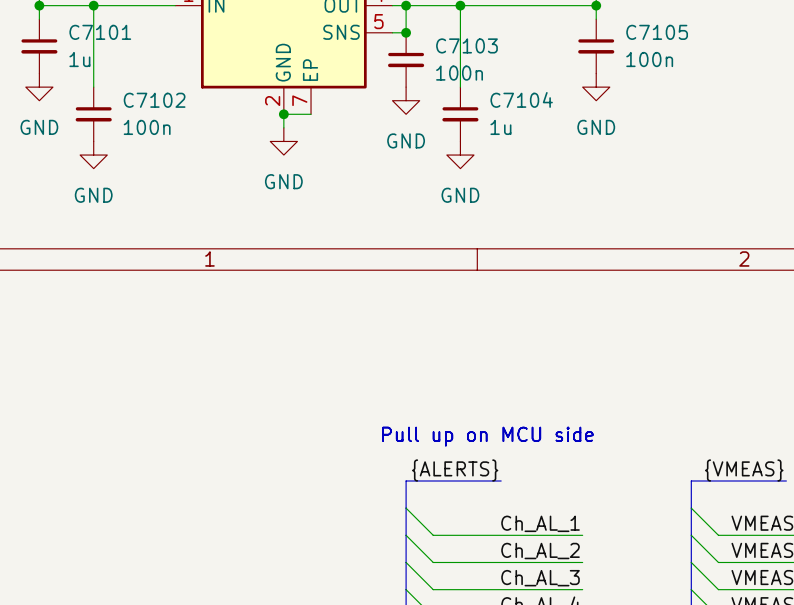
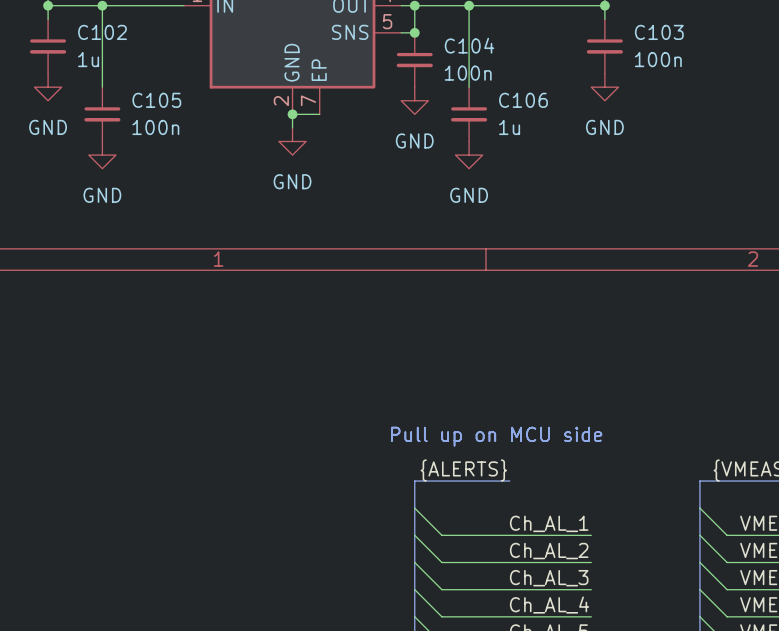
C7101 name: C7101 (100, 32) -> C102 (102, 32)
C7105 name: C7105 (657, 32) -> C103 (659, 32)
C7103 name: C7103 (466, 45) -> C104 (469, 45)
C7104 name: C7104 (521, 99) -> C106 (523, 100)
C7102 name: C7102 (154, 100) -> C105 (156, 100)

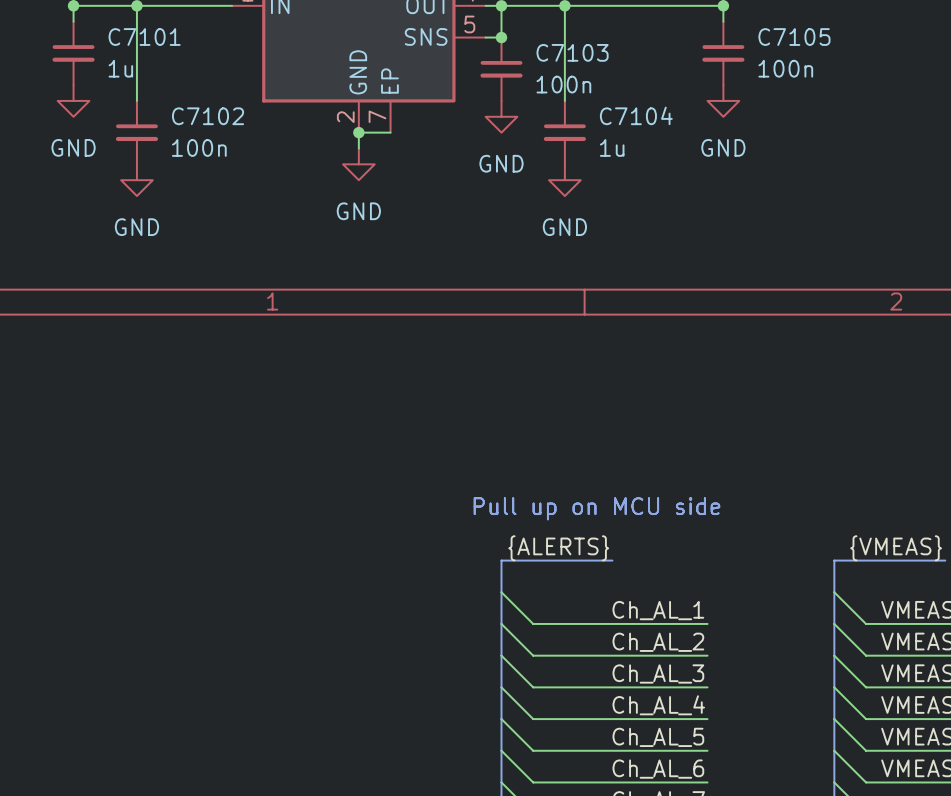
C102 name: C102 (102, 32) -> C7101 (144, 37)
C103 name: C103 (659, 32) -> C7105 (794, 37)
C104 name: C104 (469, 45) -> C7103 (572, 52)
C105 name: C105 (156, 100) -> C7102 (208, 116)
C106 name: C106 (523, 100) -> C7104 (636, 115)

